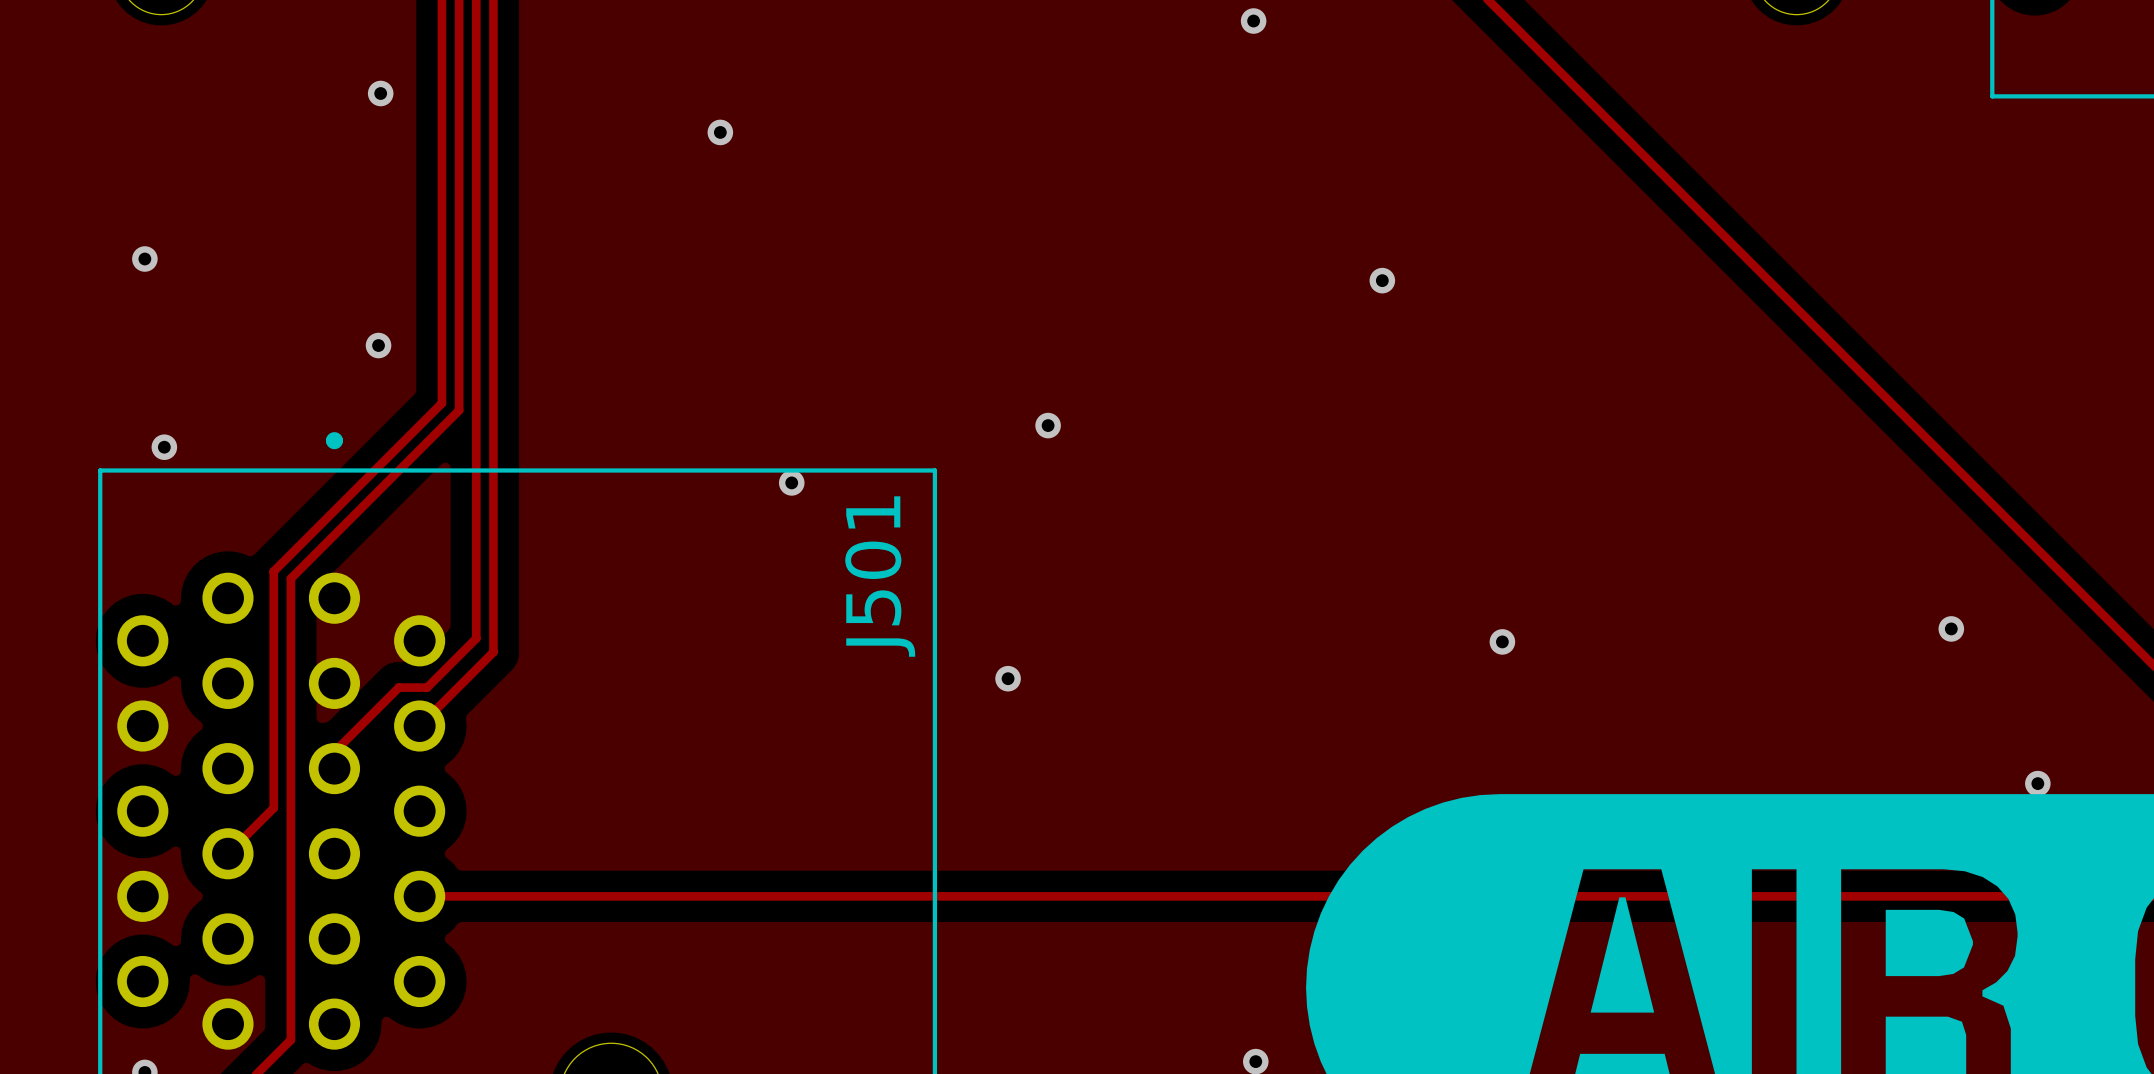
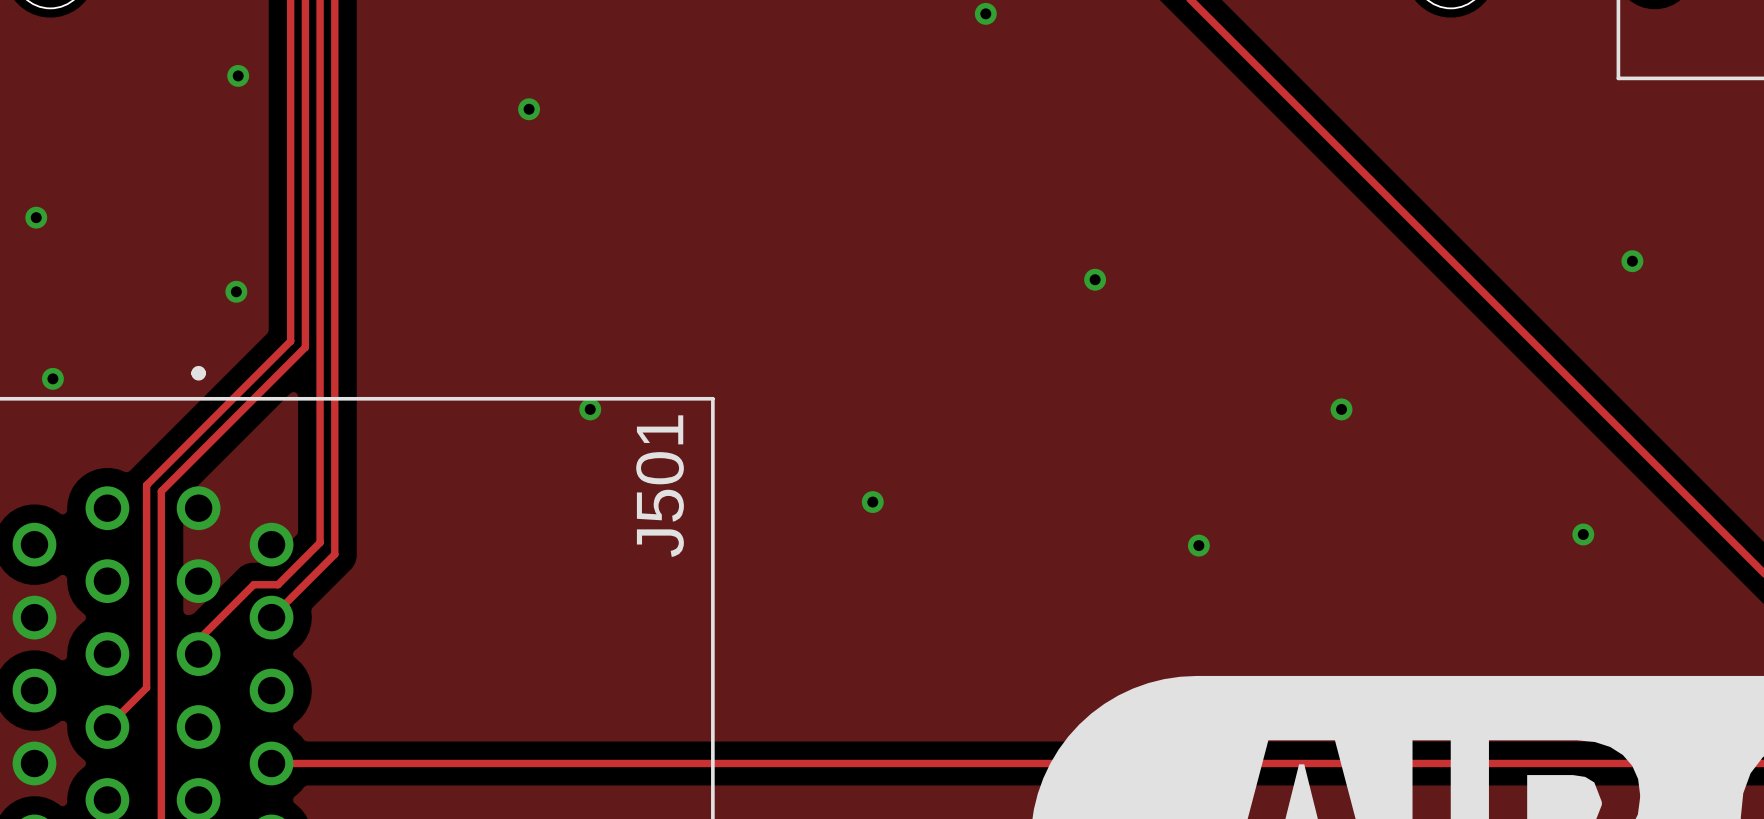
via position: (1382, 280) -> (1095, 279)
via: none -> (1632, 261)
via: (1048, 425) -> none
via: none -> (1341, 409)
via: none -> (872, 502)
via: (1008, 678) -> none
via: (2037, 783) -> none

